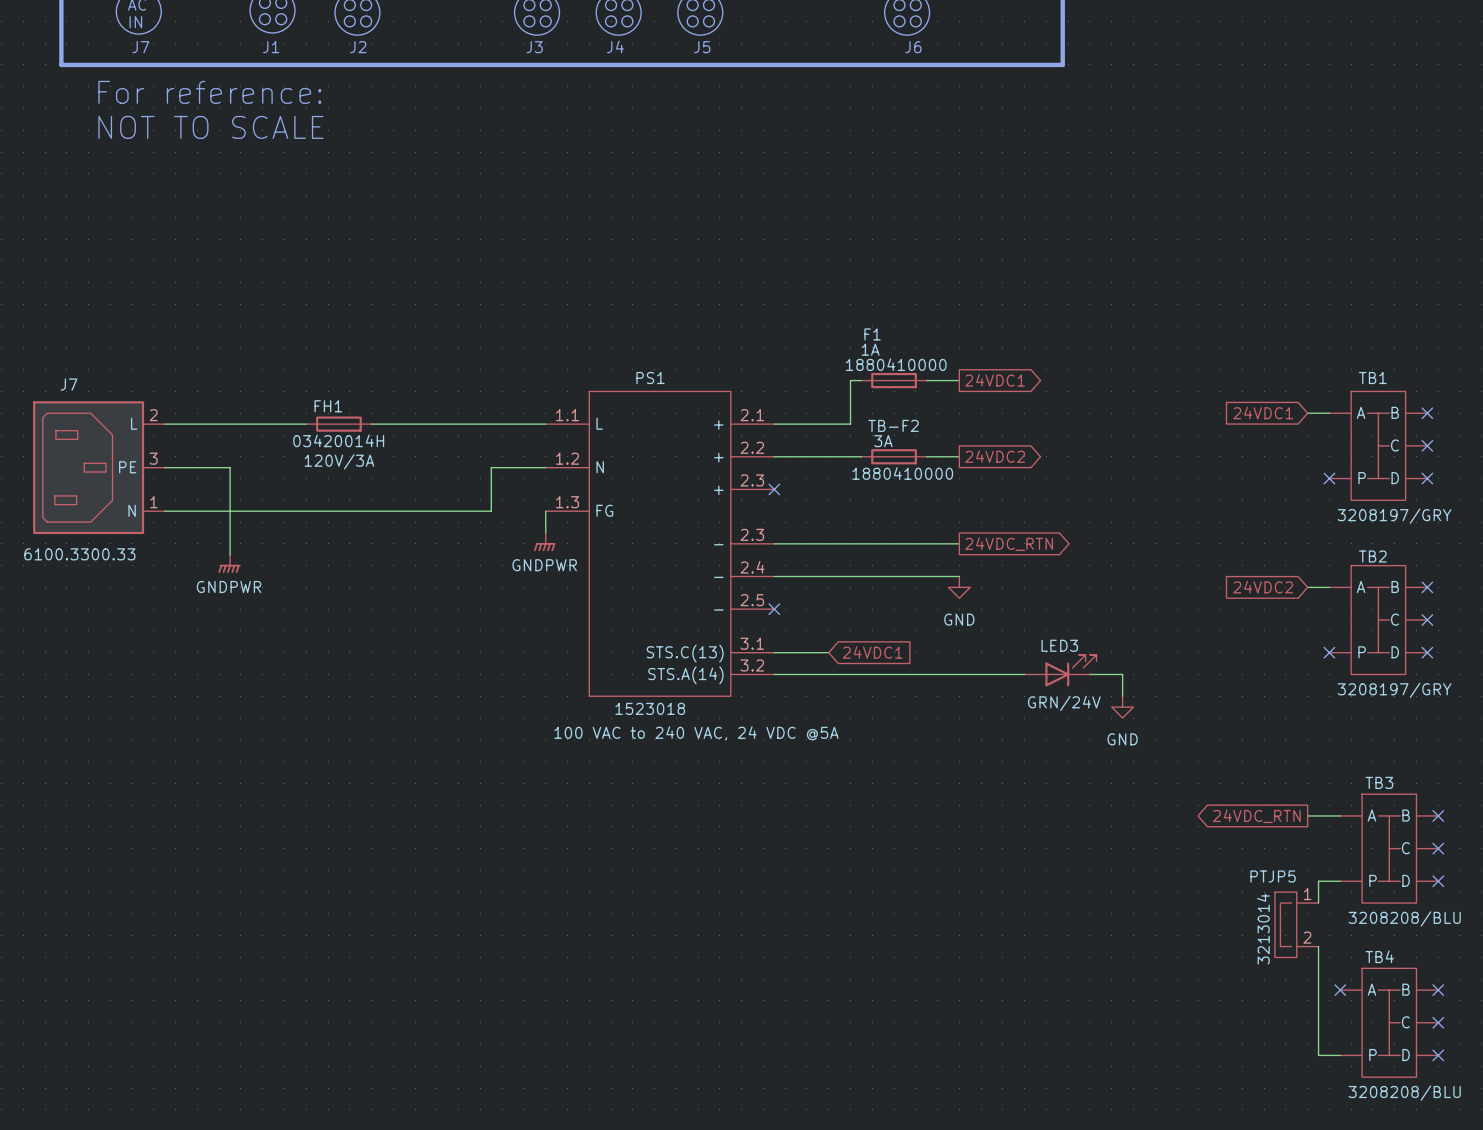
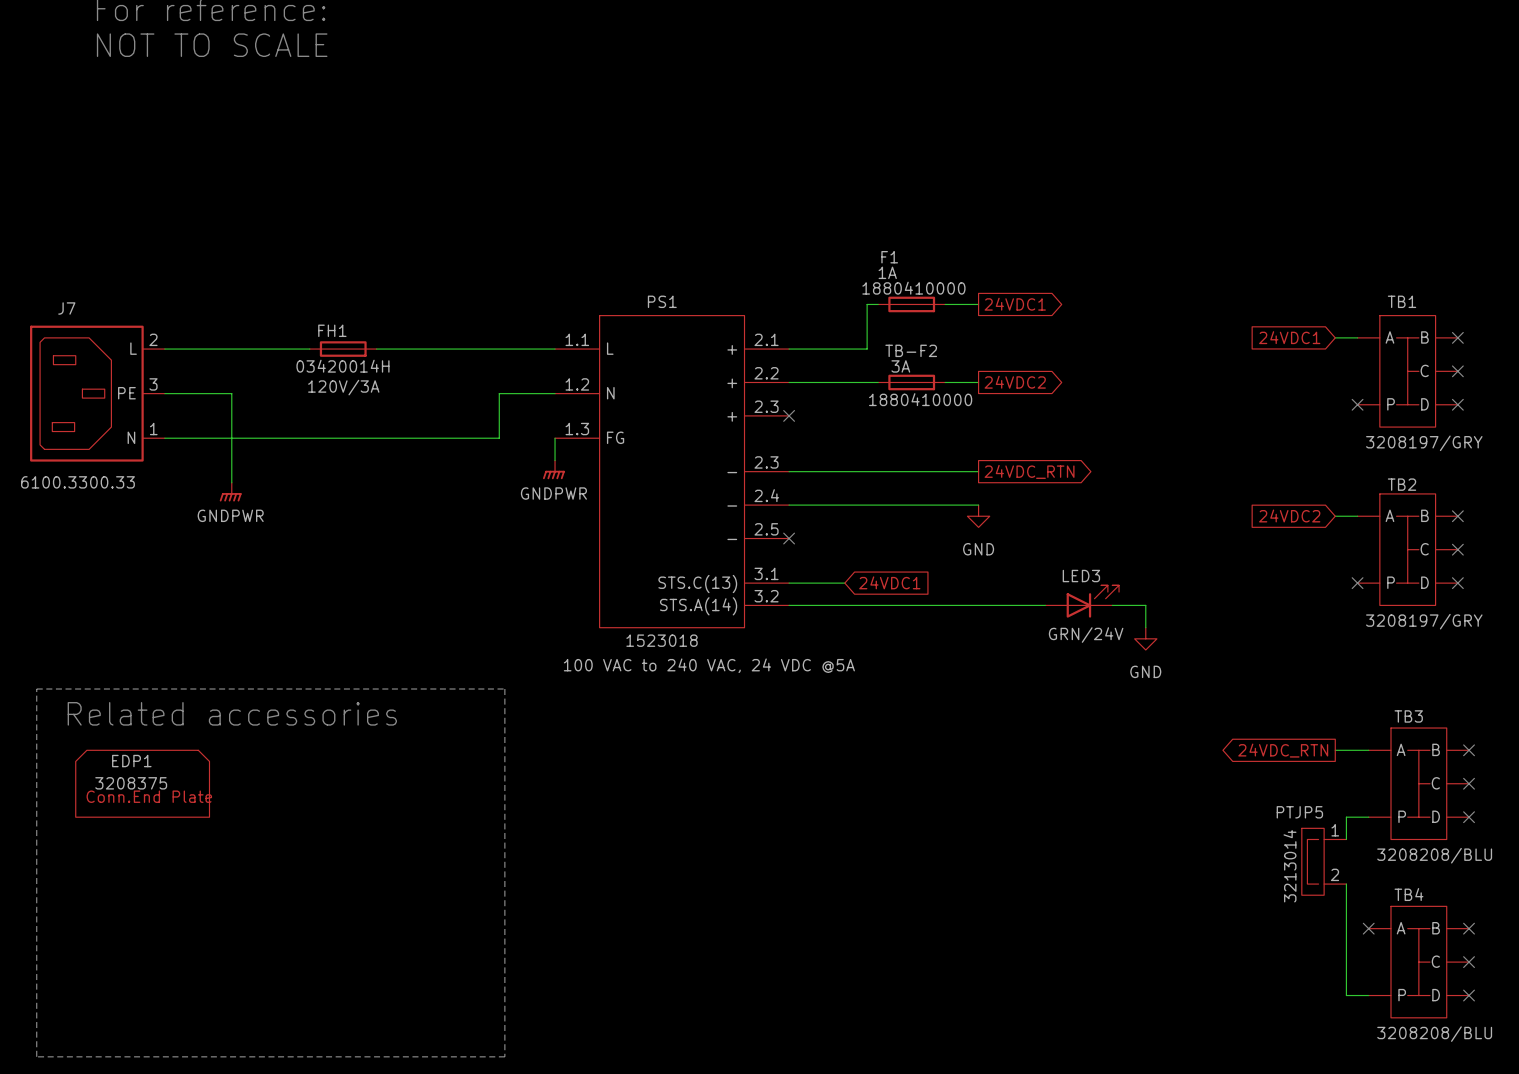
line: none -> (36, 689) (504, 689) (504, 1056) (36, 1056) (36, 689)
text: none -> Related accessories (232, 713)
EDP1: none -> 3208375 (142, 783)

